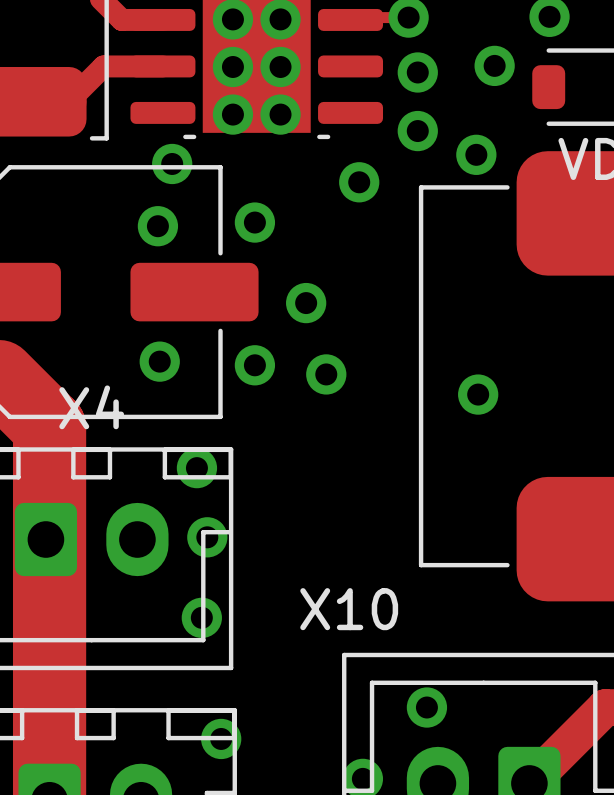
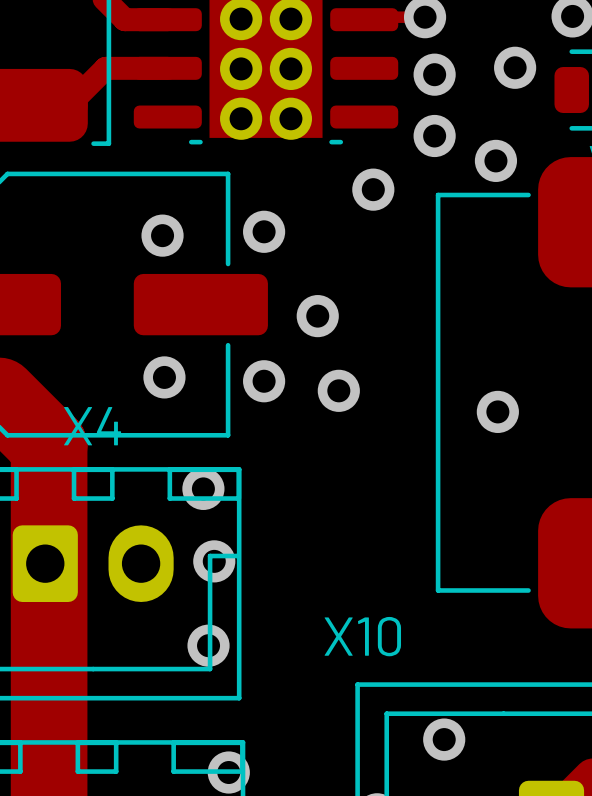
via: (172, 163) -> none

